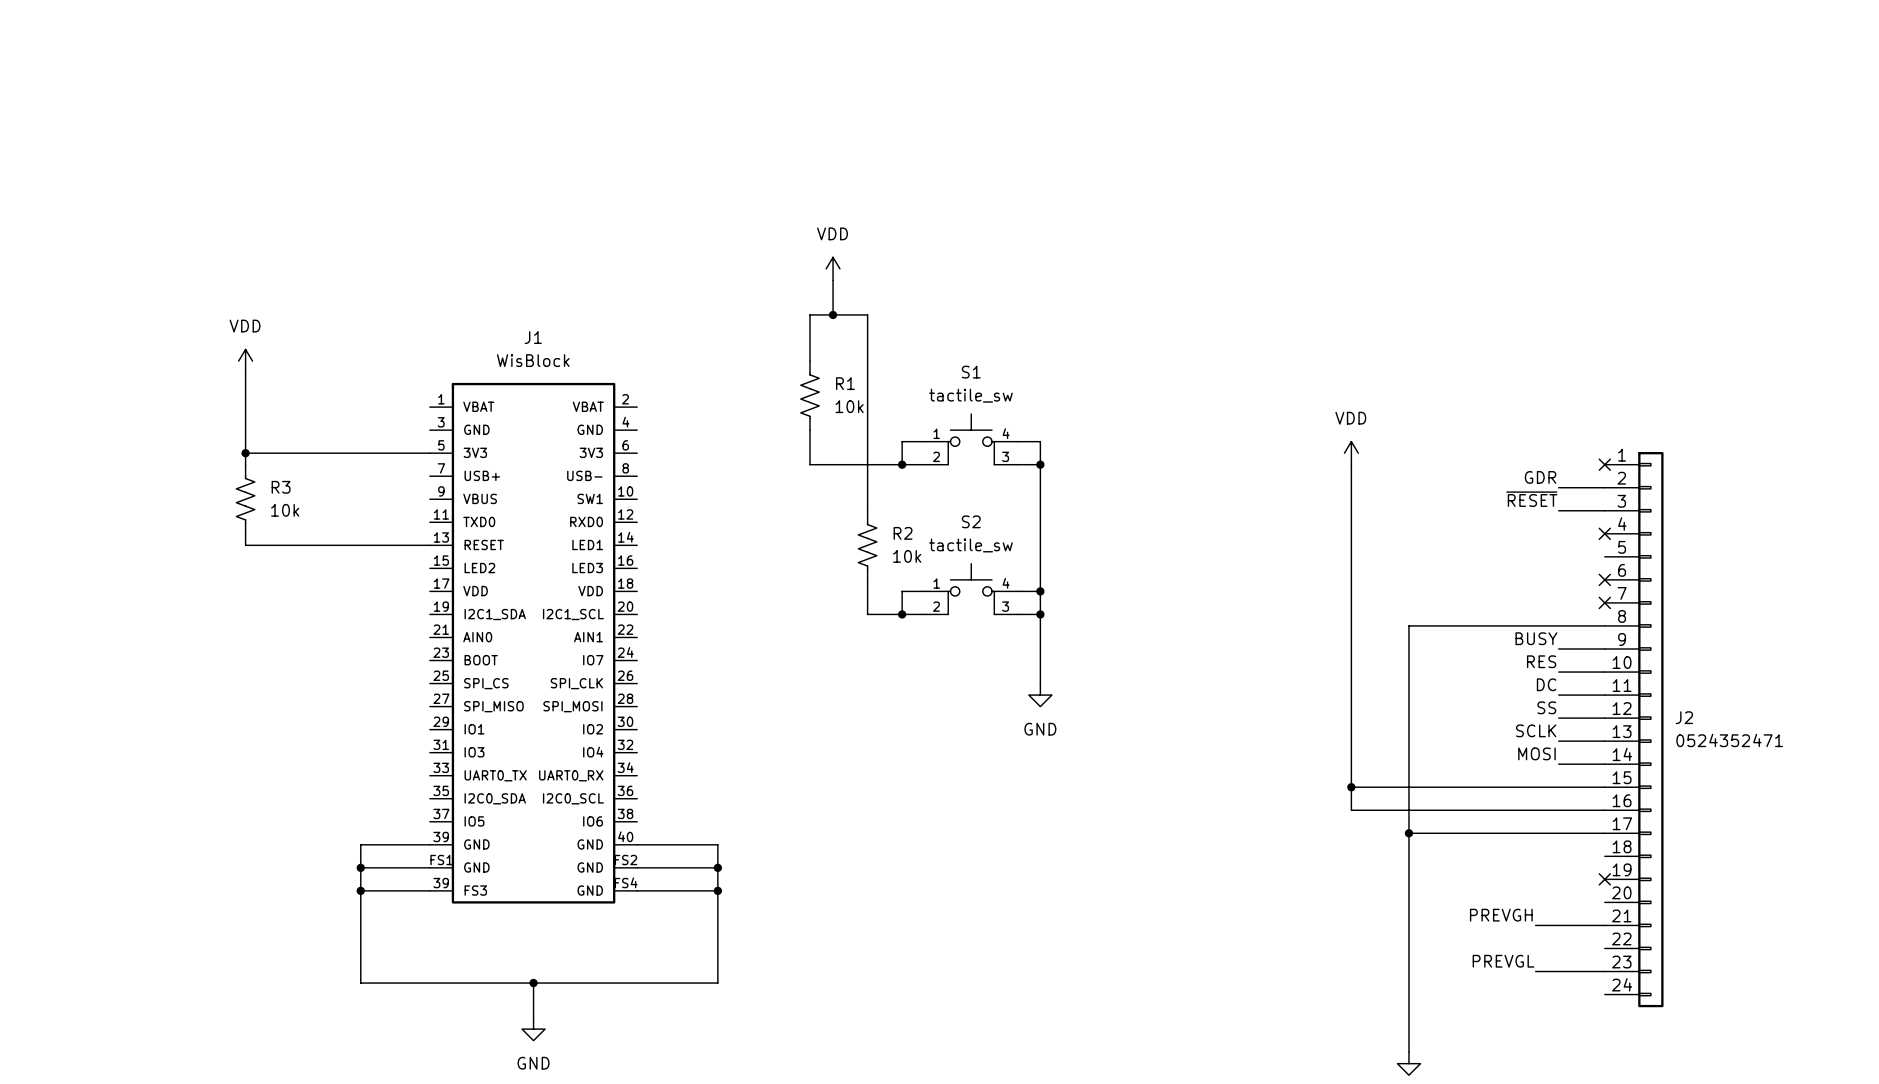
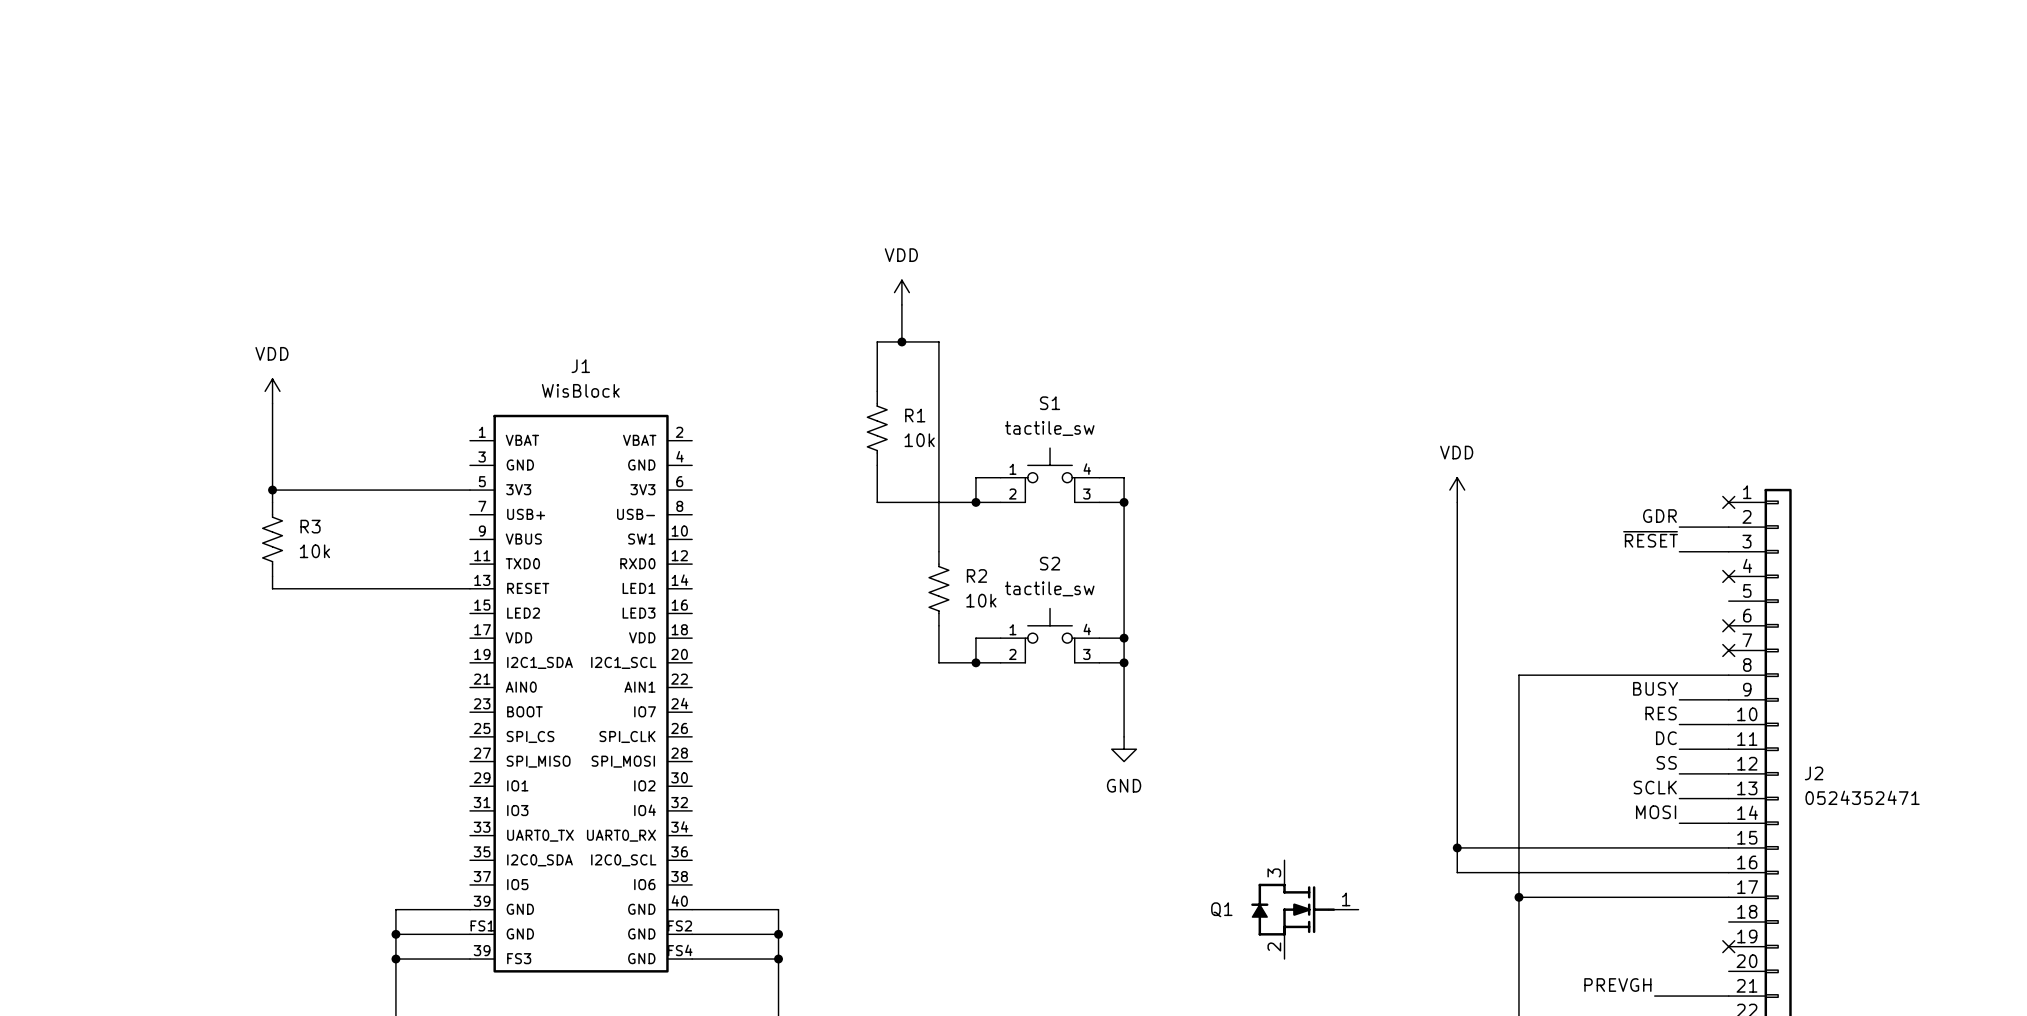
Q1: none -> (1304, 909)

